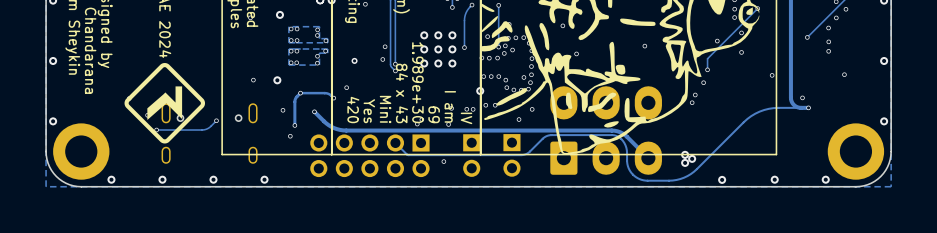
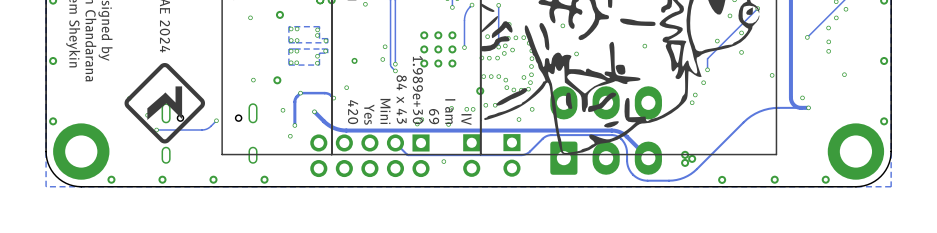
via: (734, 9) -> none
via: none -> (729, 15)
via: (734, 17) -> none

